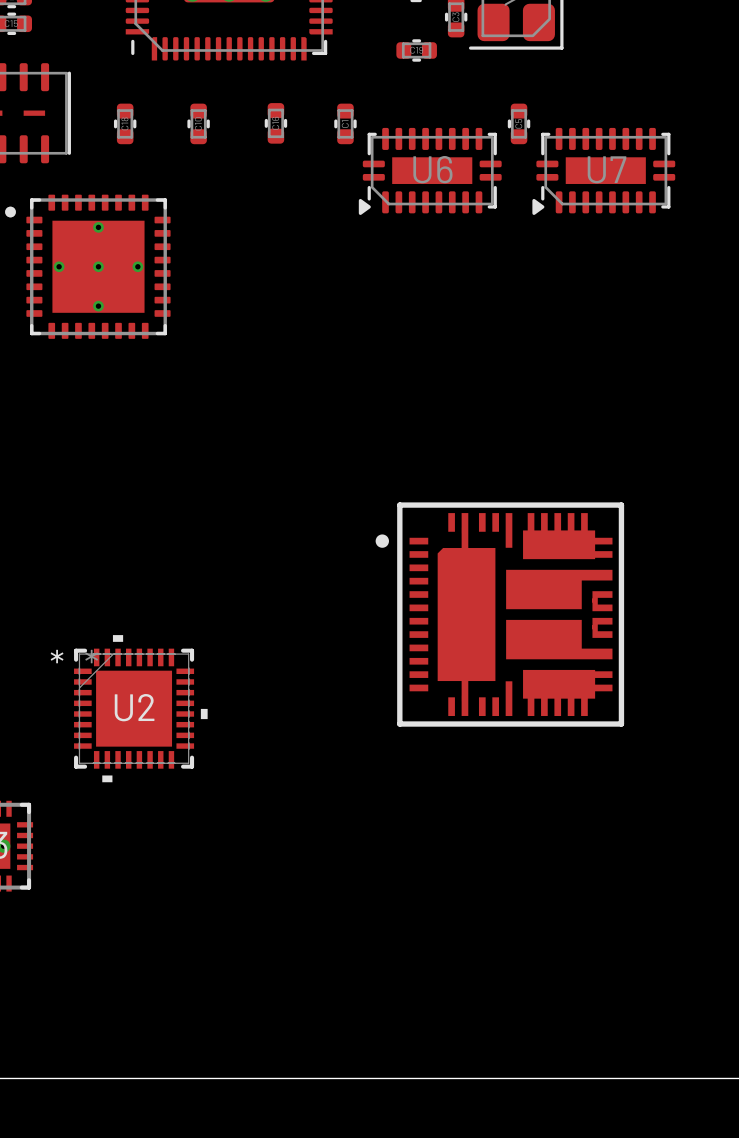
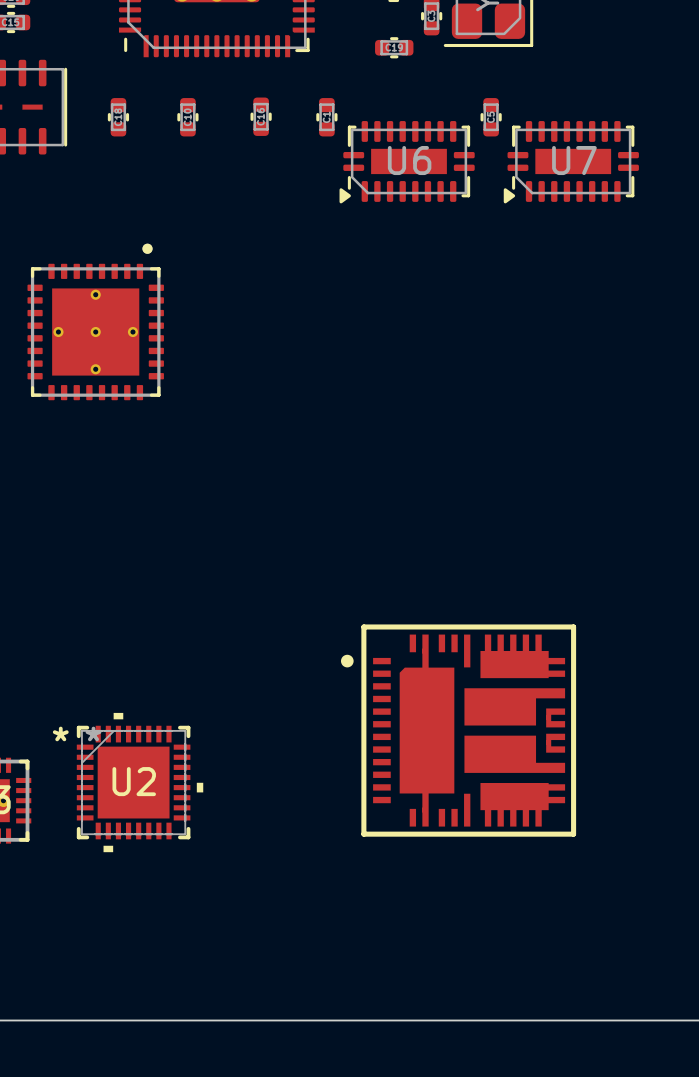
part rotation: 0° (87, 266) -> 90° clockwise (95, 321)
part position: (499, 614) -> (458, 730)
U2 position: (140, 708) -> (140, 782)

